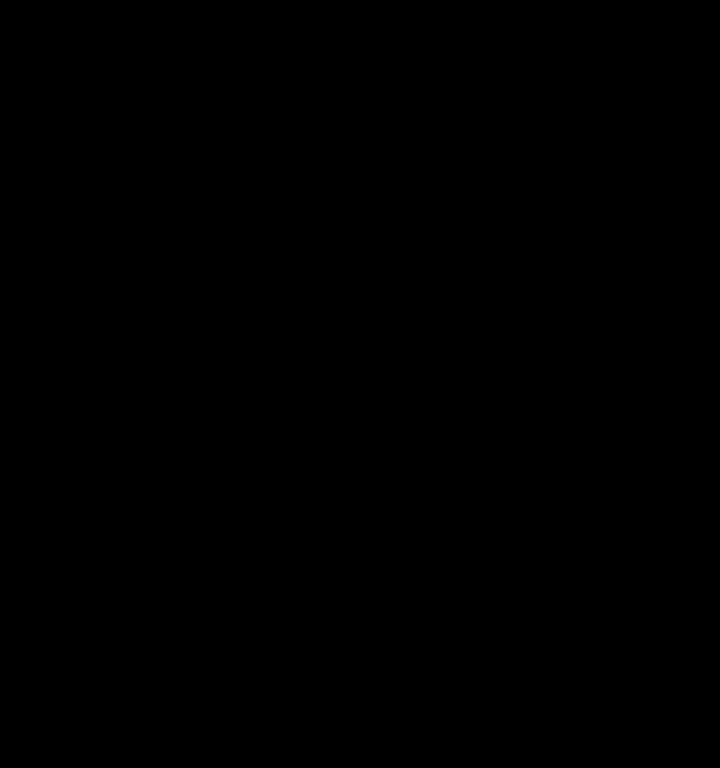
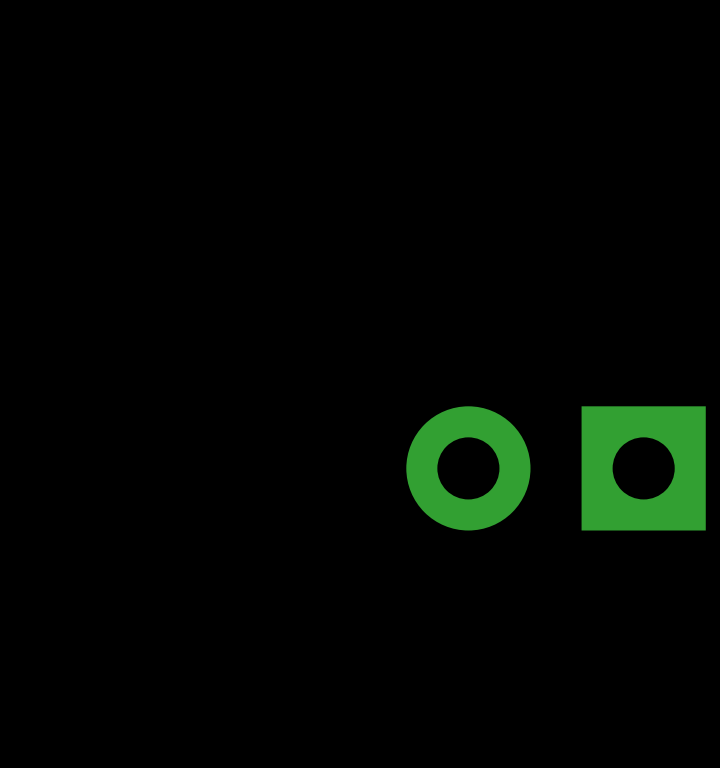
part: none -> (556, 468)

